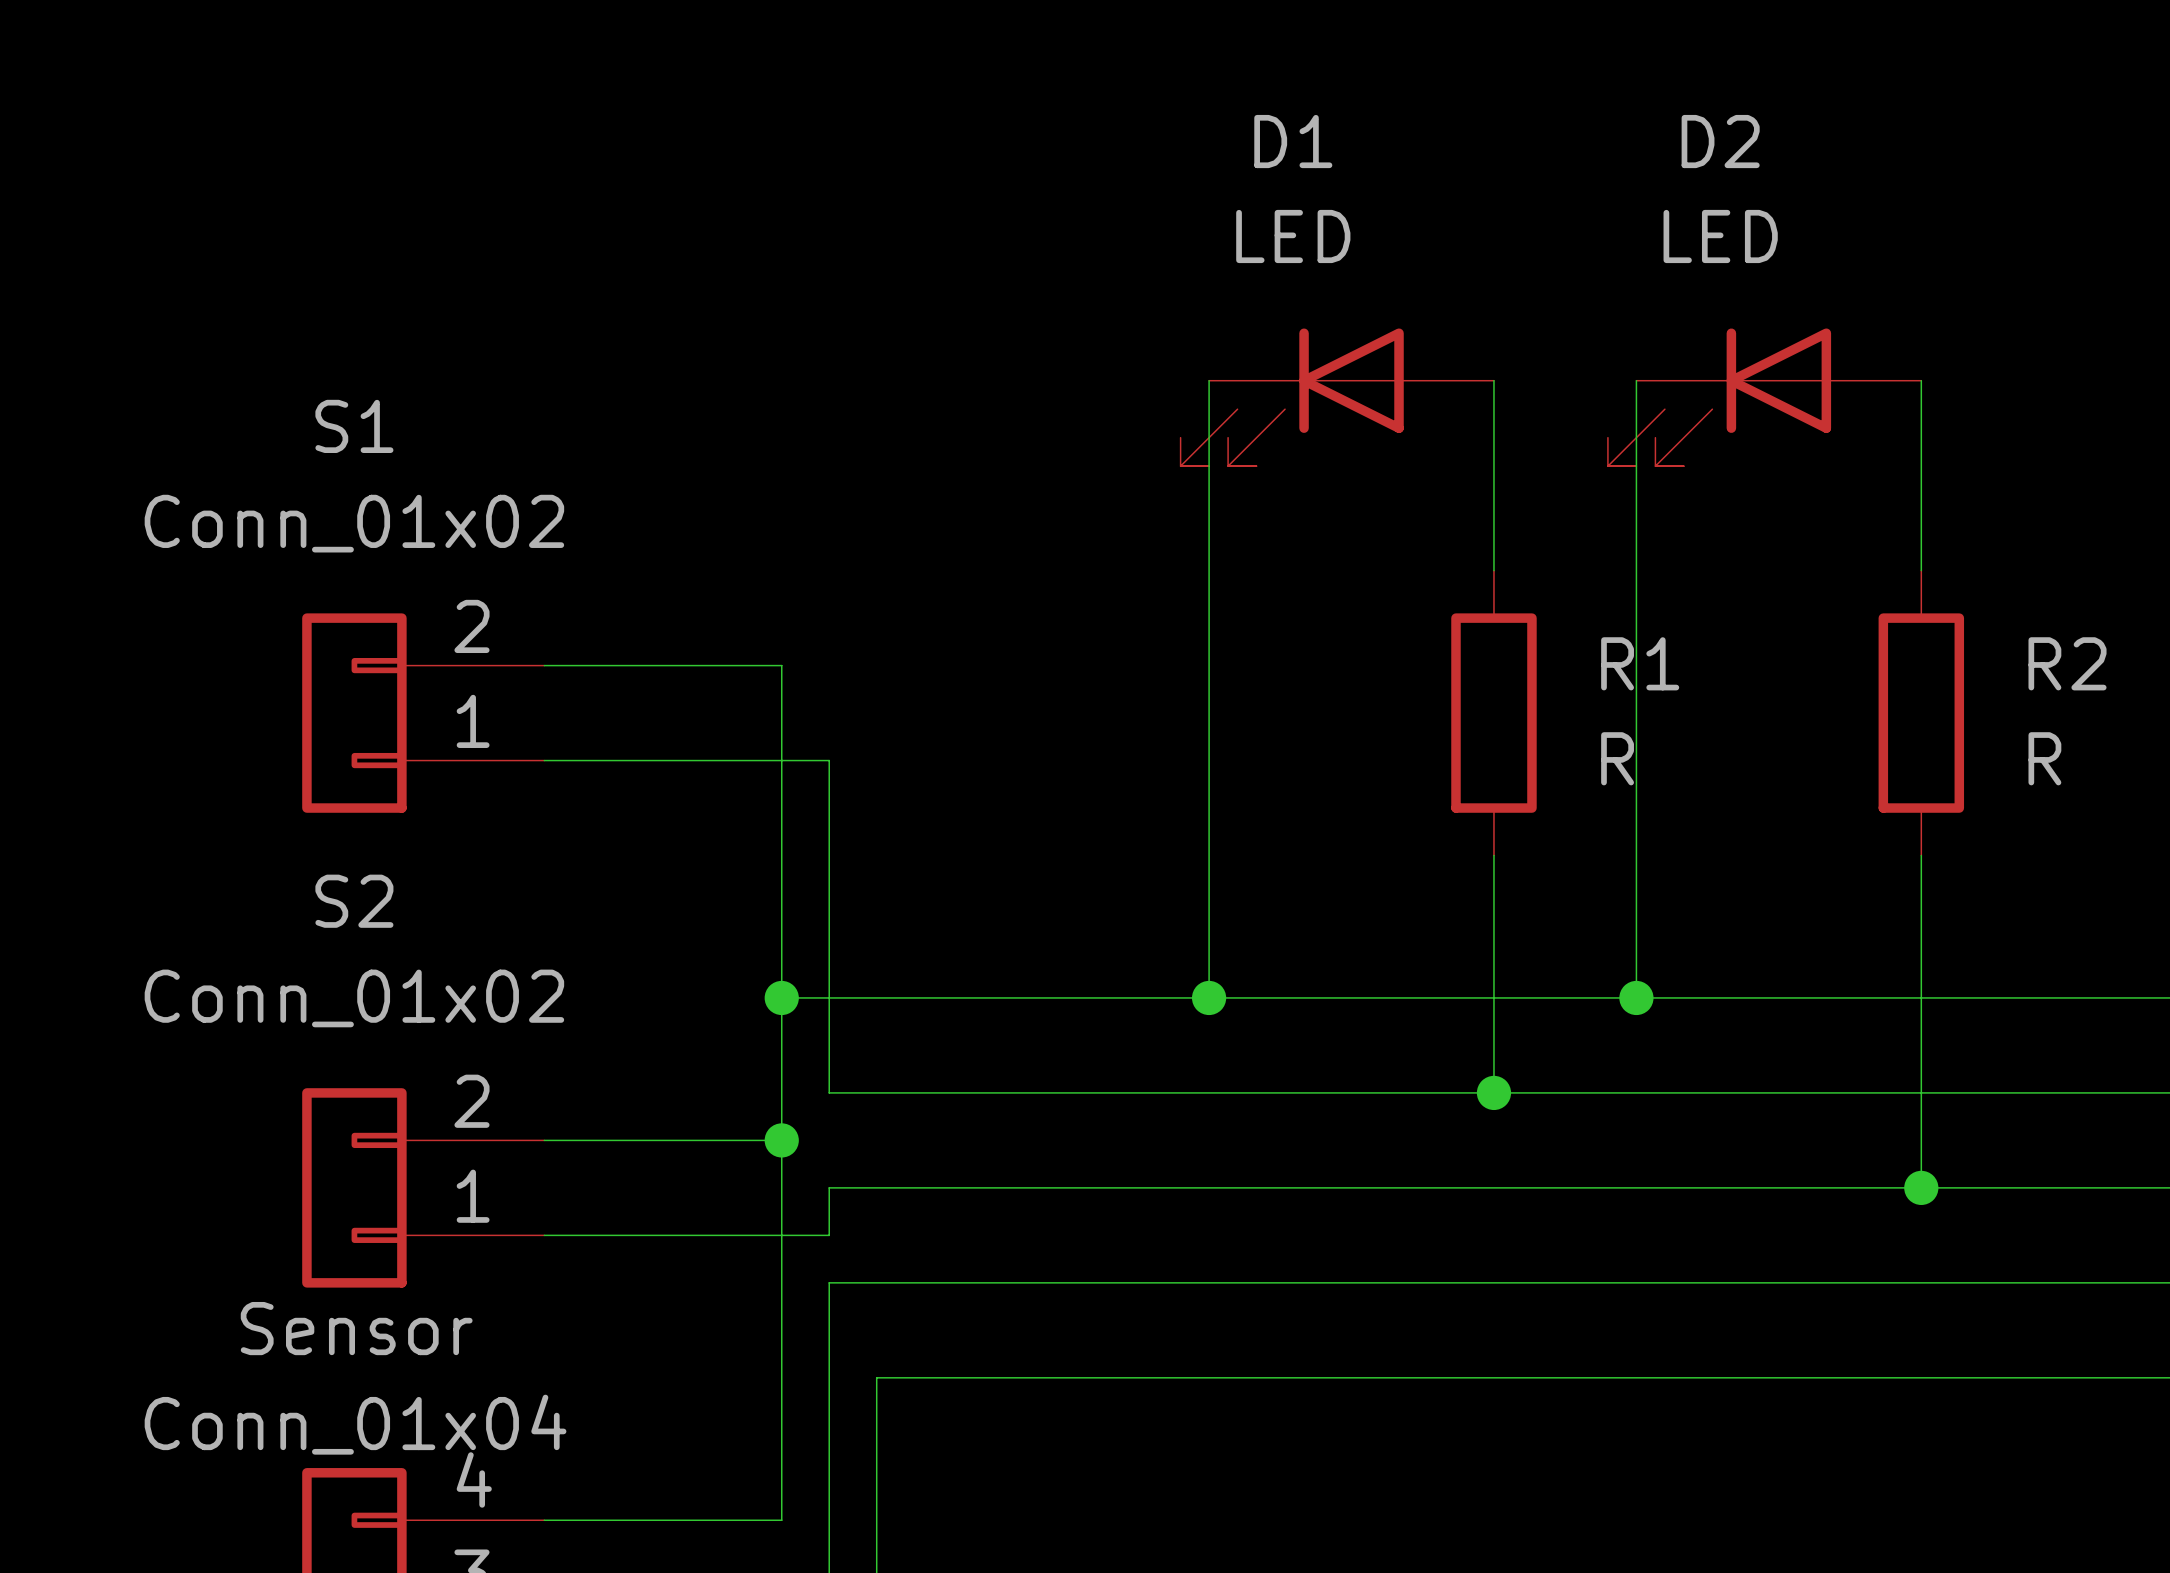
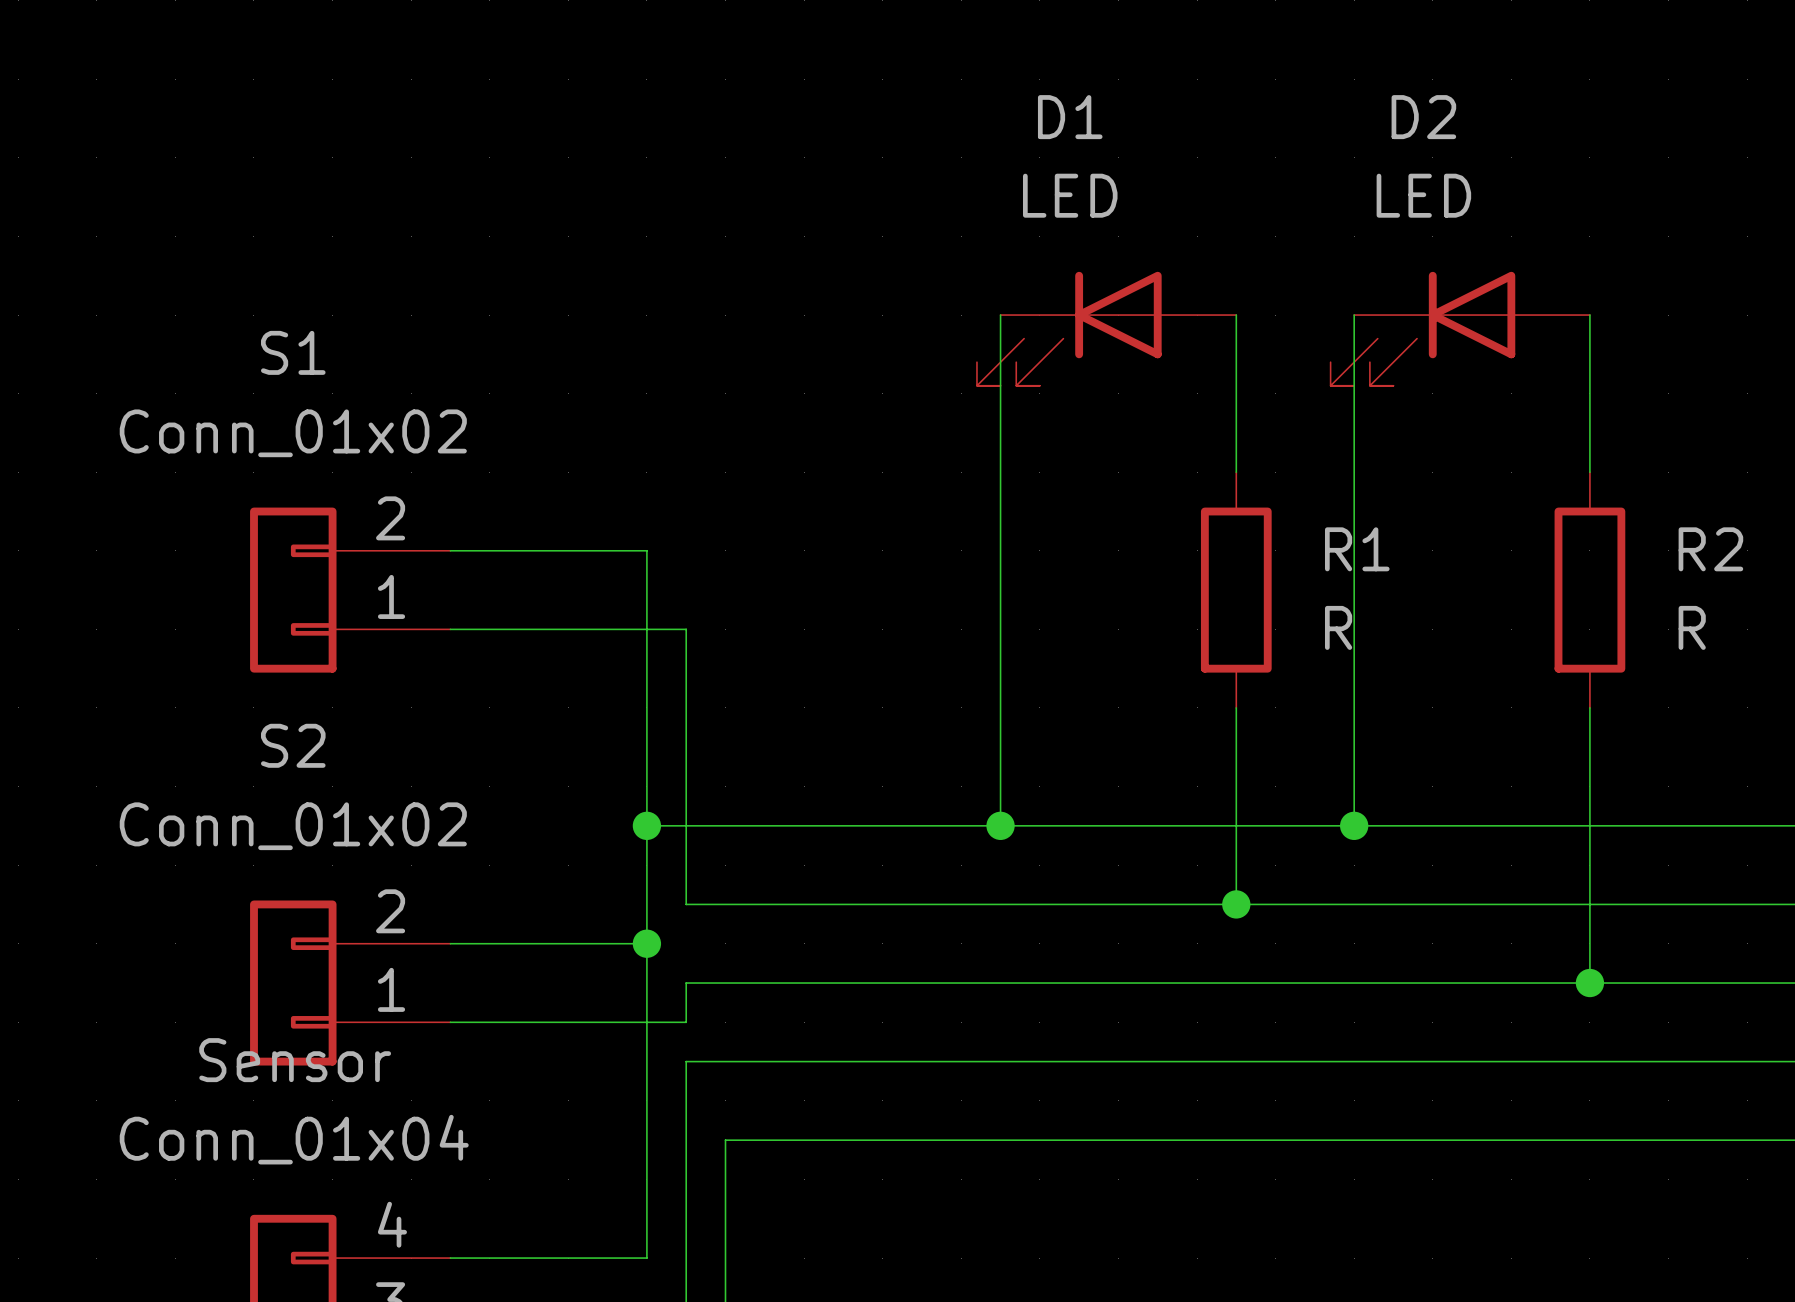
Sensor name position: Sensor (356, 1328) -> Sensor (295, 1060)
Sensor value position: Conn_01x04 (355, 1424) -> Conn_01x04 (294, 1139)

